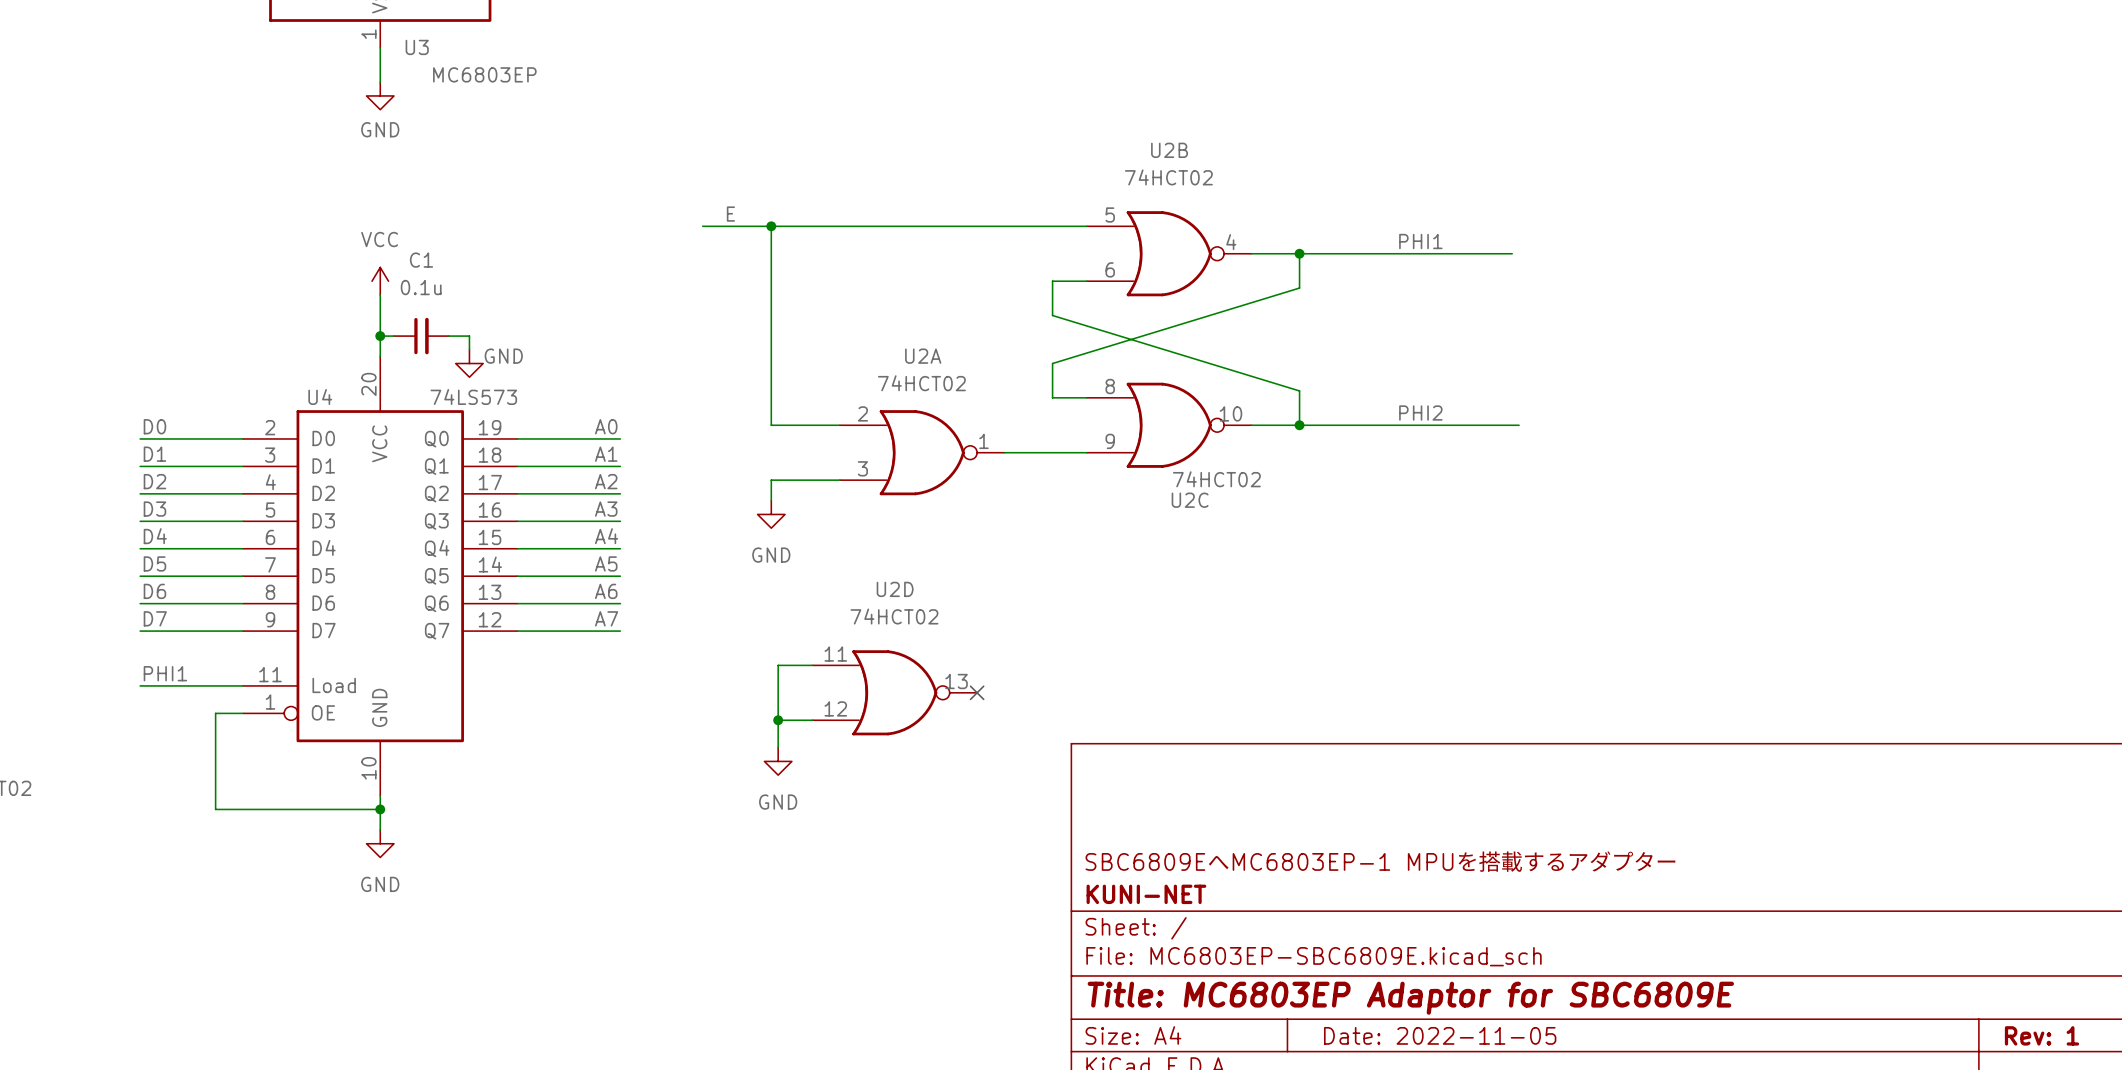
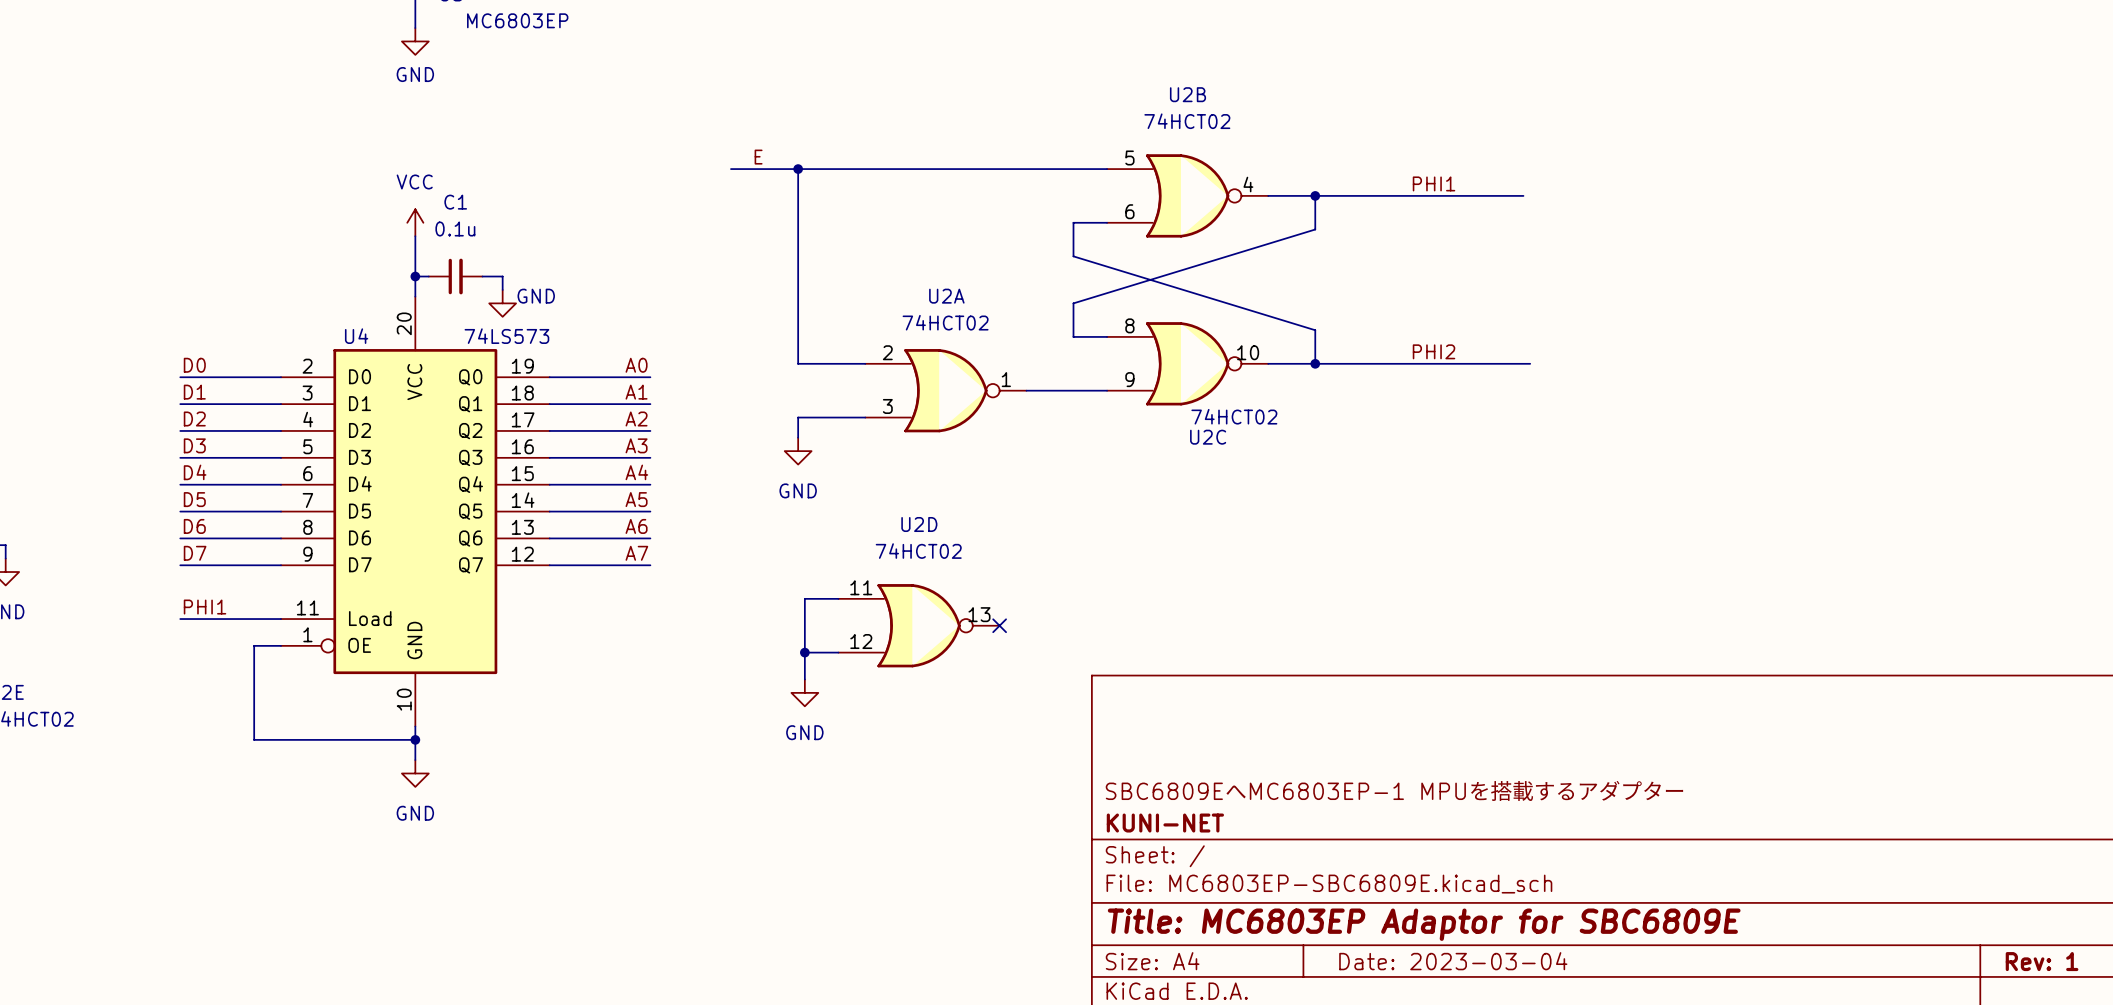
title block: Date: 2022-11-05 (1440, 1035) -> Date: 2023-03-04 (1453, 961)

